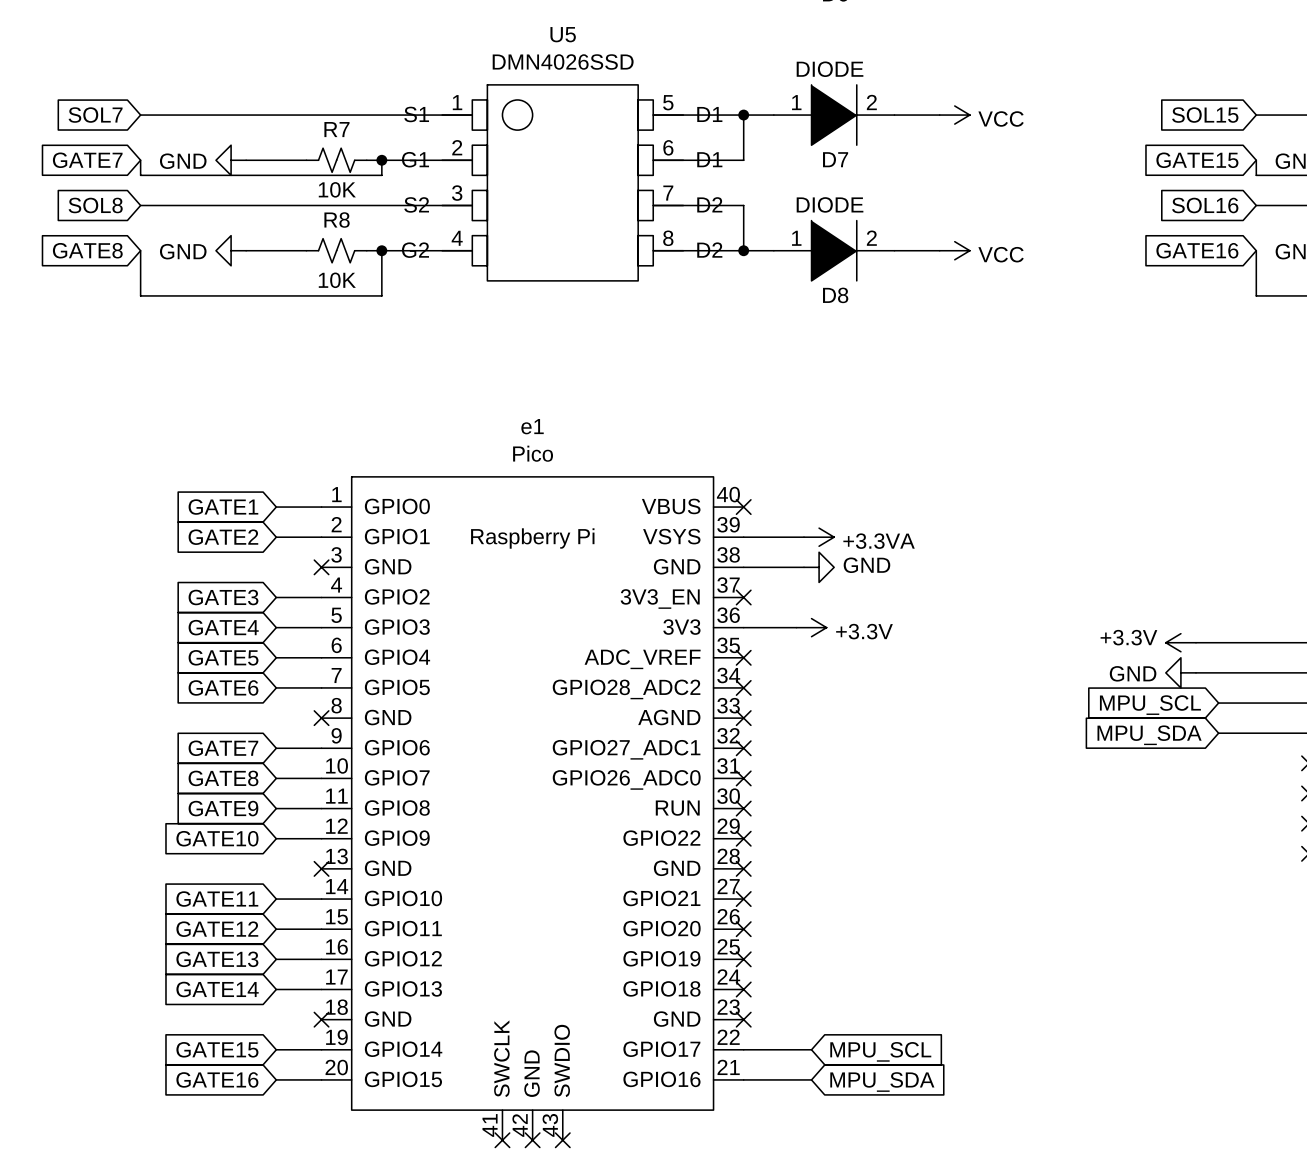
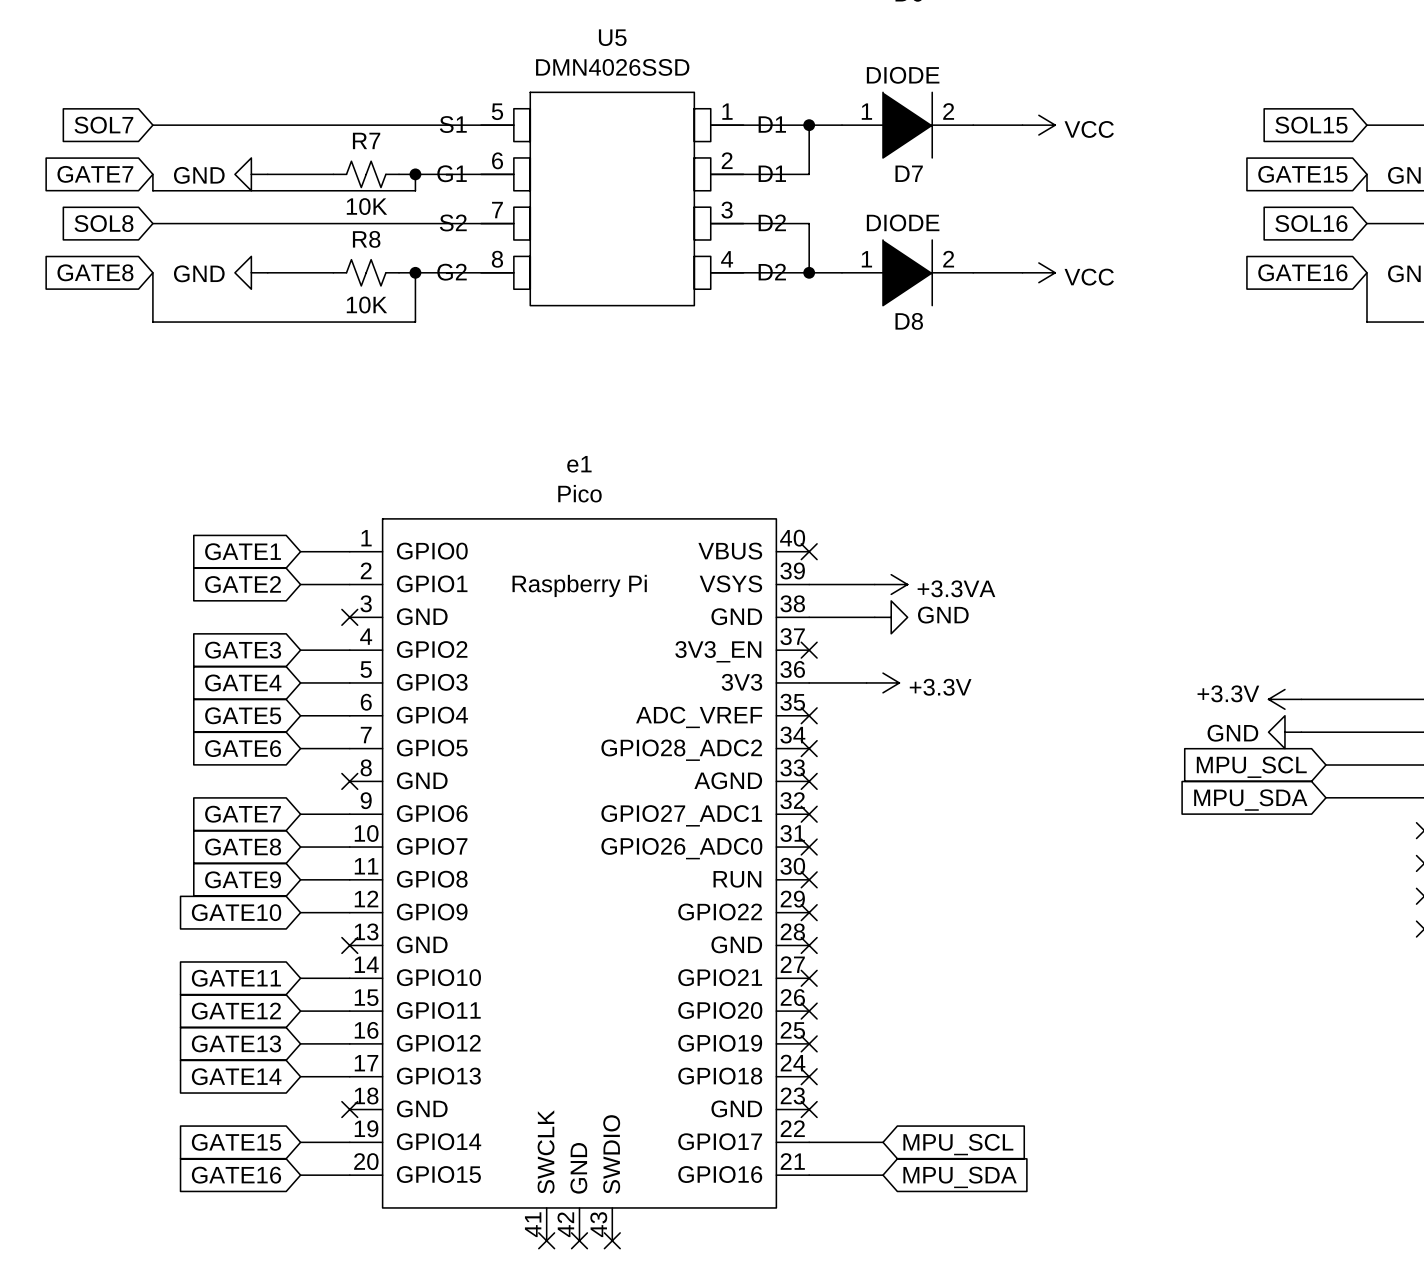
U5 symbol: [442, 84, 684, 281] -> [481, 92, 744, 306]

